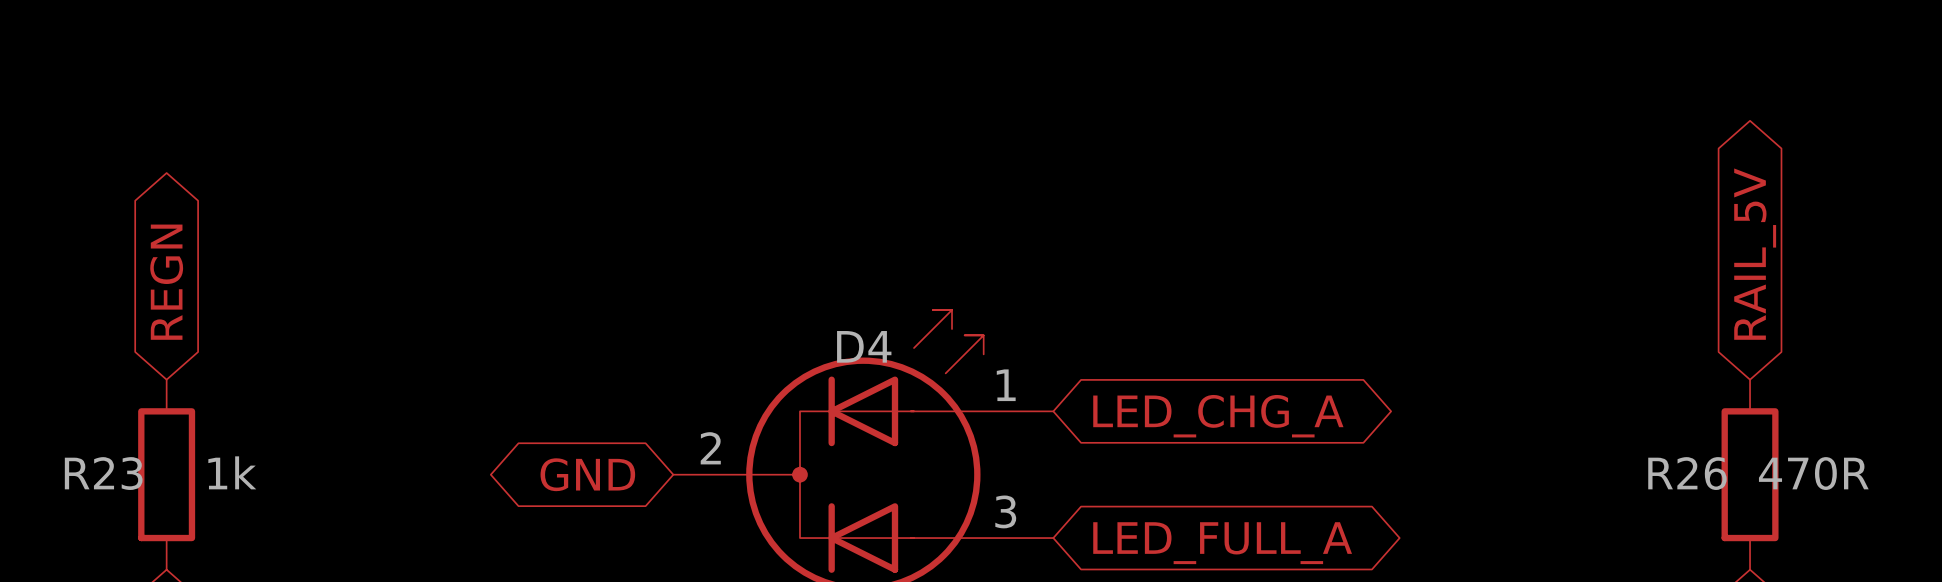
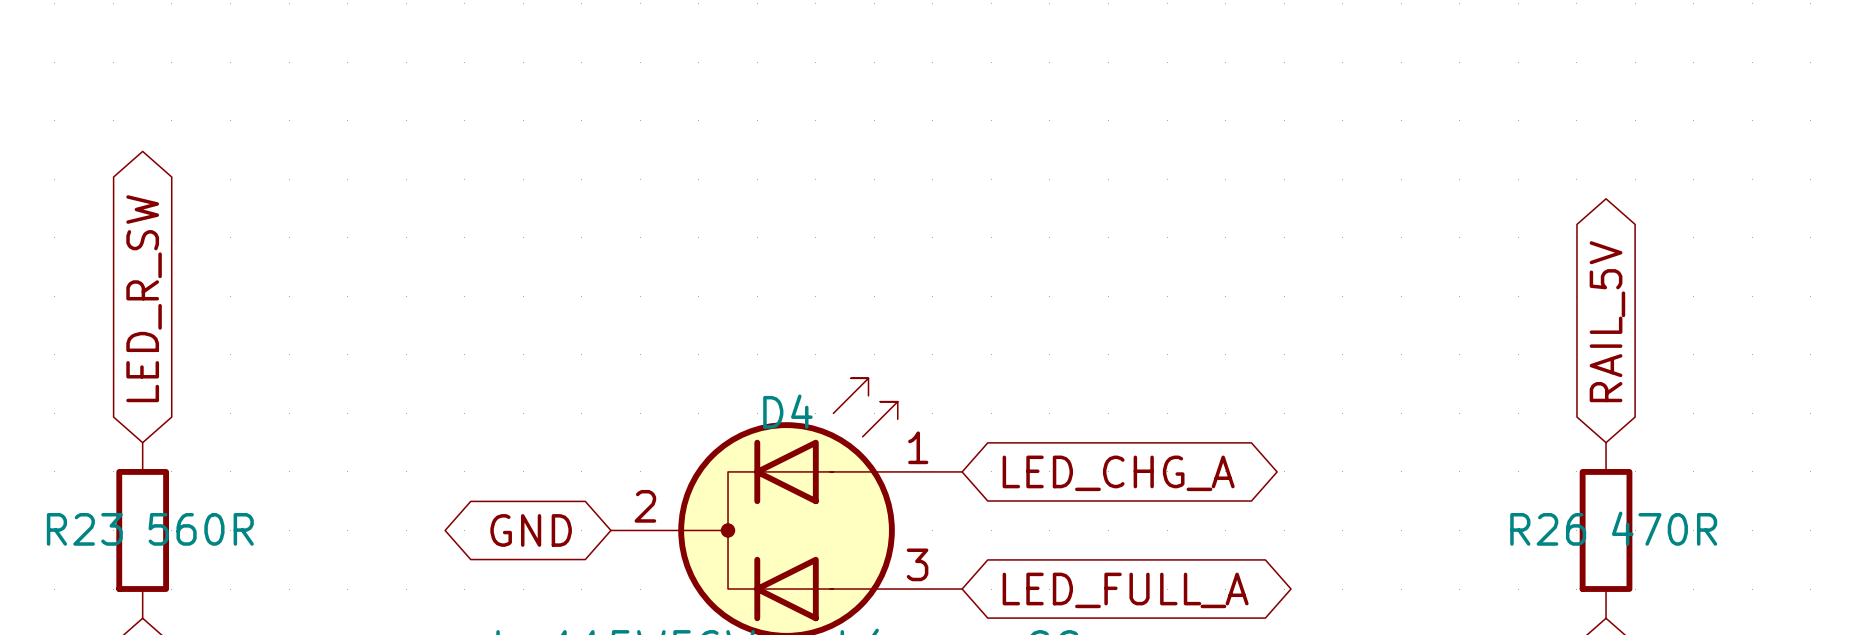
global label: REGN (166, 282) -> LED_R_SW (144, 298)
R23 value: 1k (232, 472) -> 560R (201, 529)

